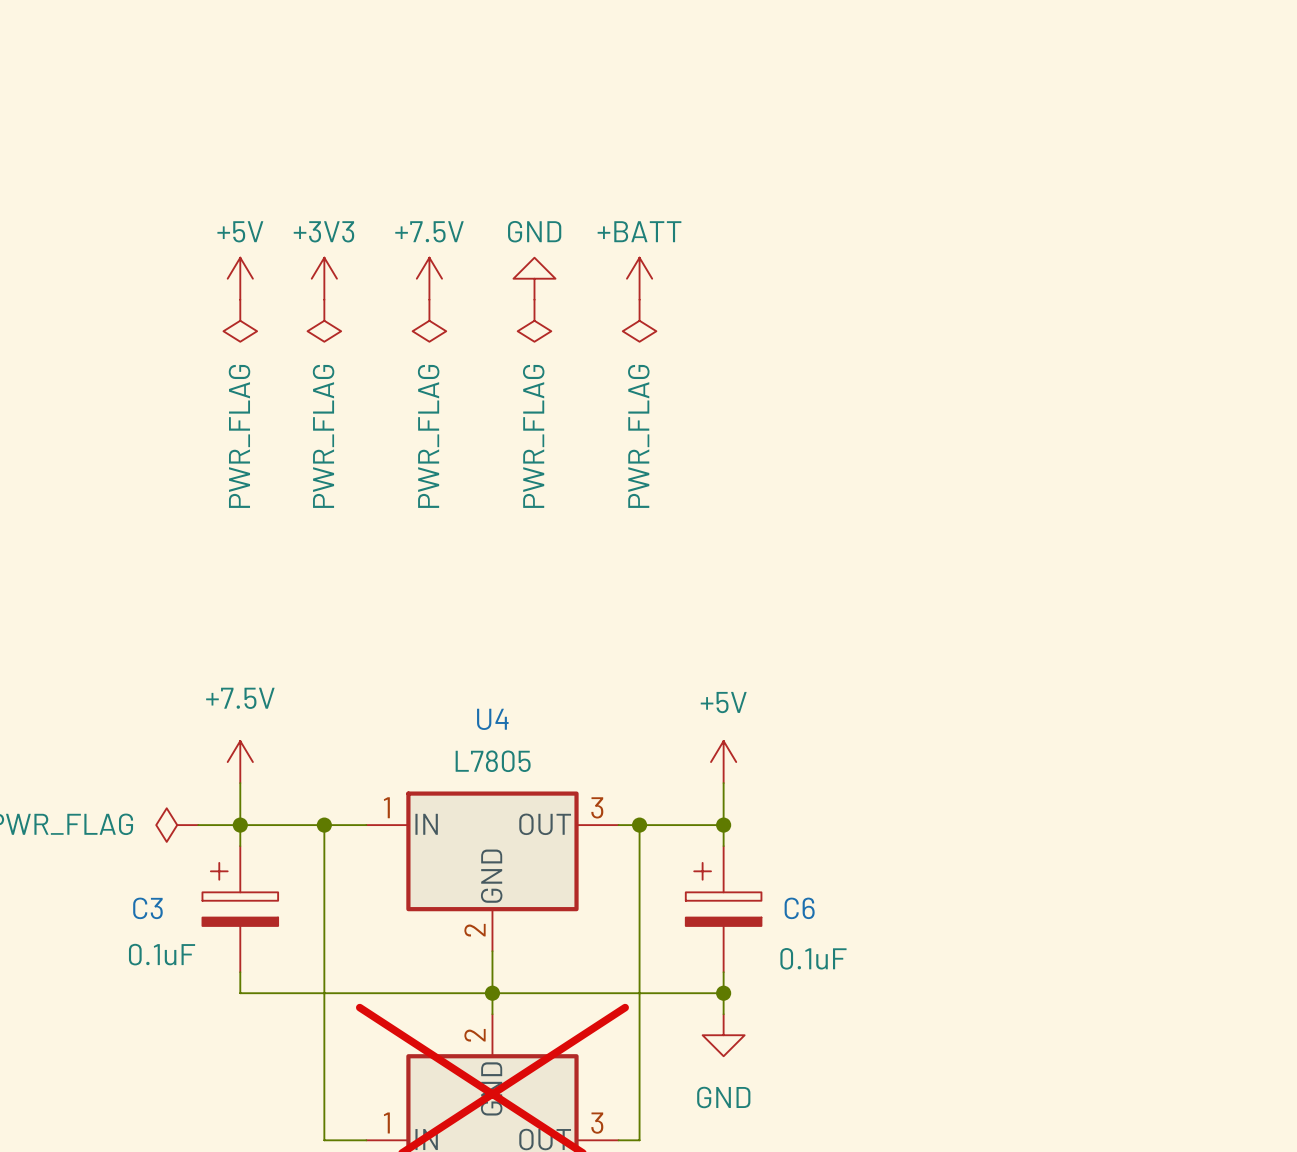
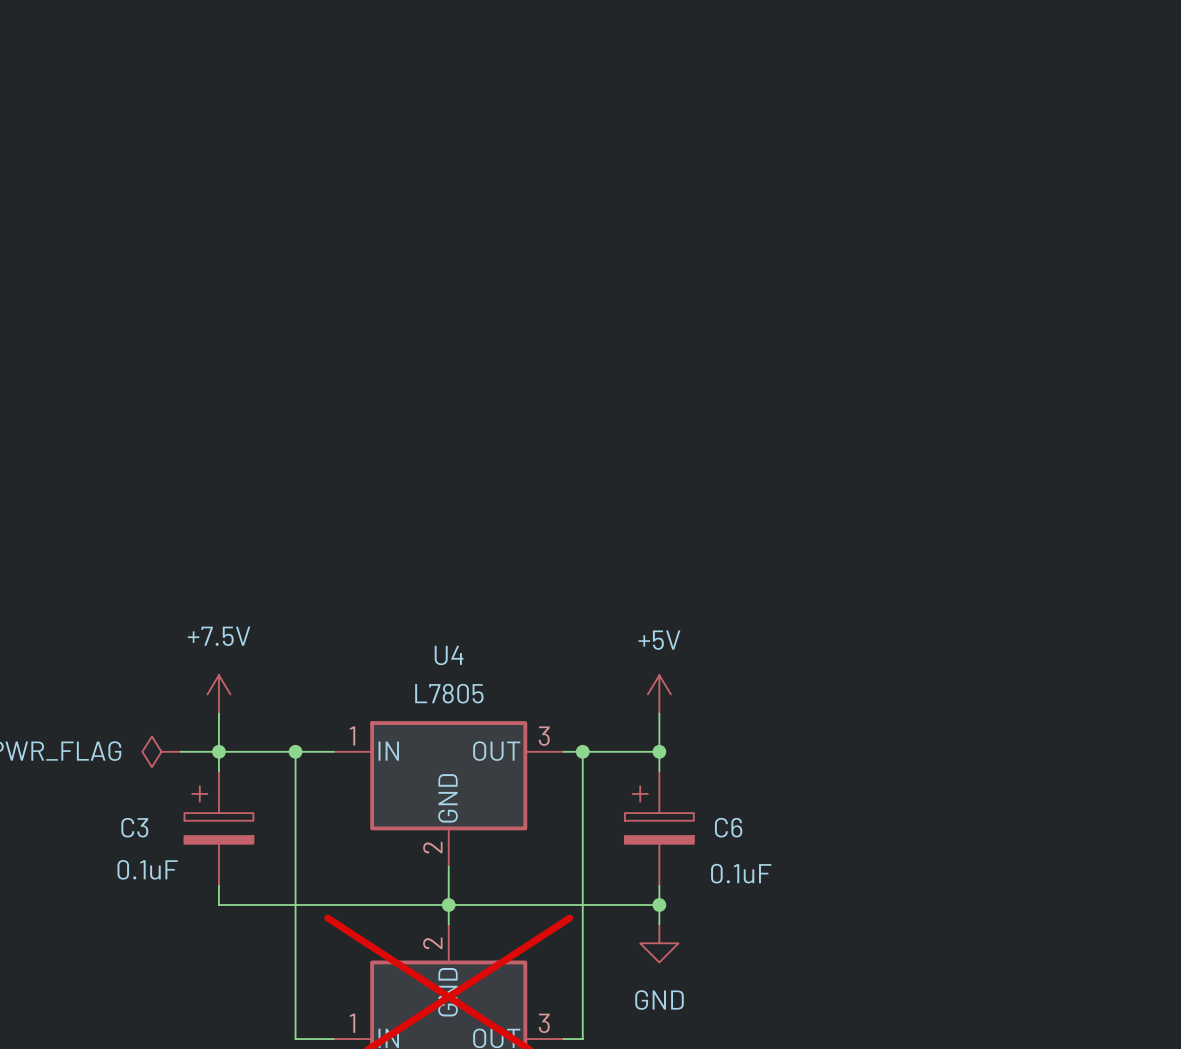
power symbol: +5V (240, 278) -> none
power symbol: +3V3 (324, 278) -> none
power symbol: +7.5V (429, 278) -> none
power symbol: GND (534, 278) -> none
power symbol: +BATT (639, 278) -> none
power symbol: PWR_FLAG (240, 320) -> none
power symbol: PWR_FLAG (324, 320) -> none
power symbol: PWR_FLAG (429, 320) -> none
power symbol: PWR_FLAG (534, 320) -> none
power symbol: PWR_FLAG (639, 320) -> none

